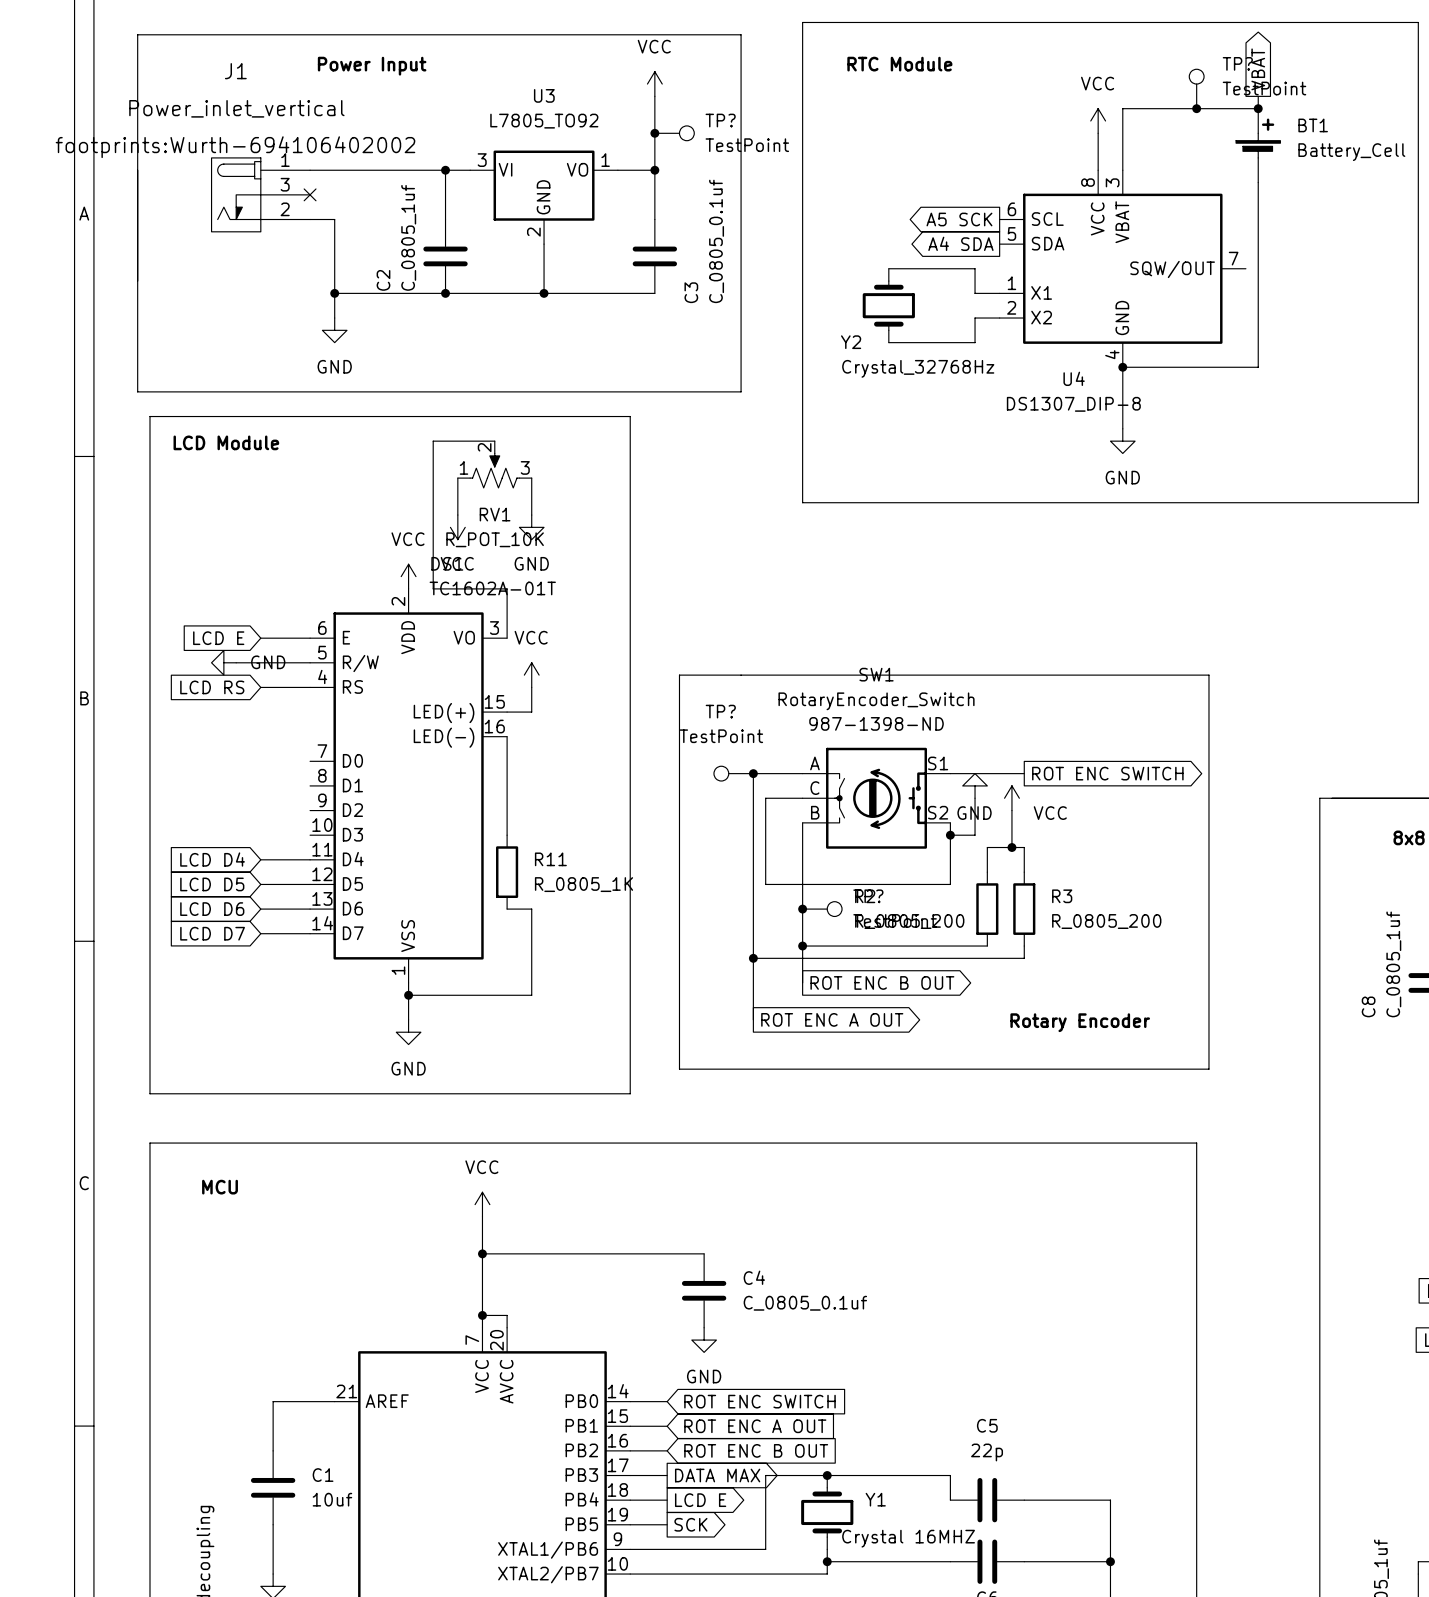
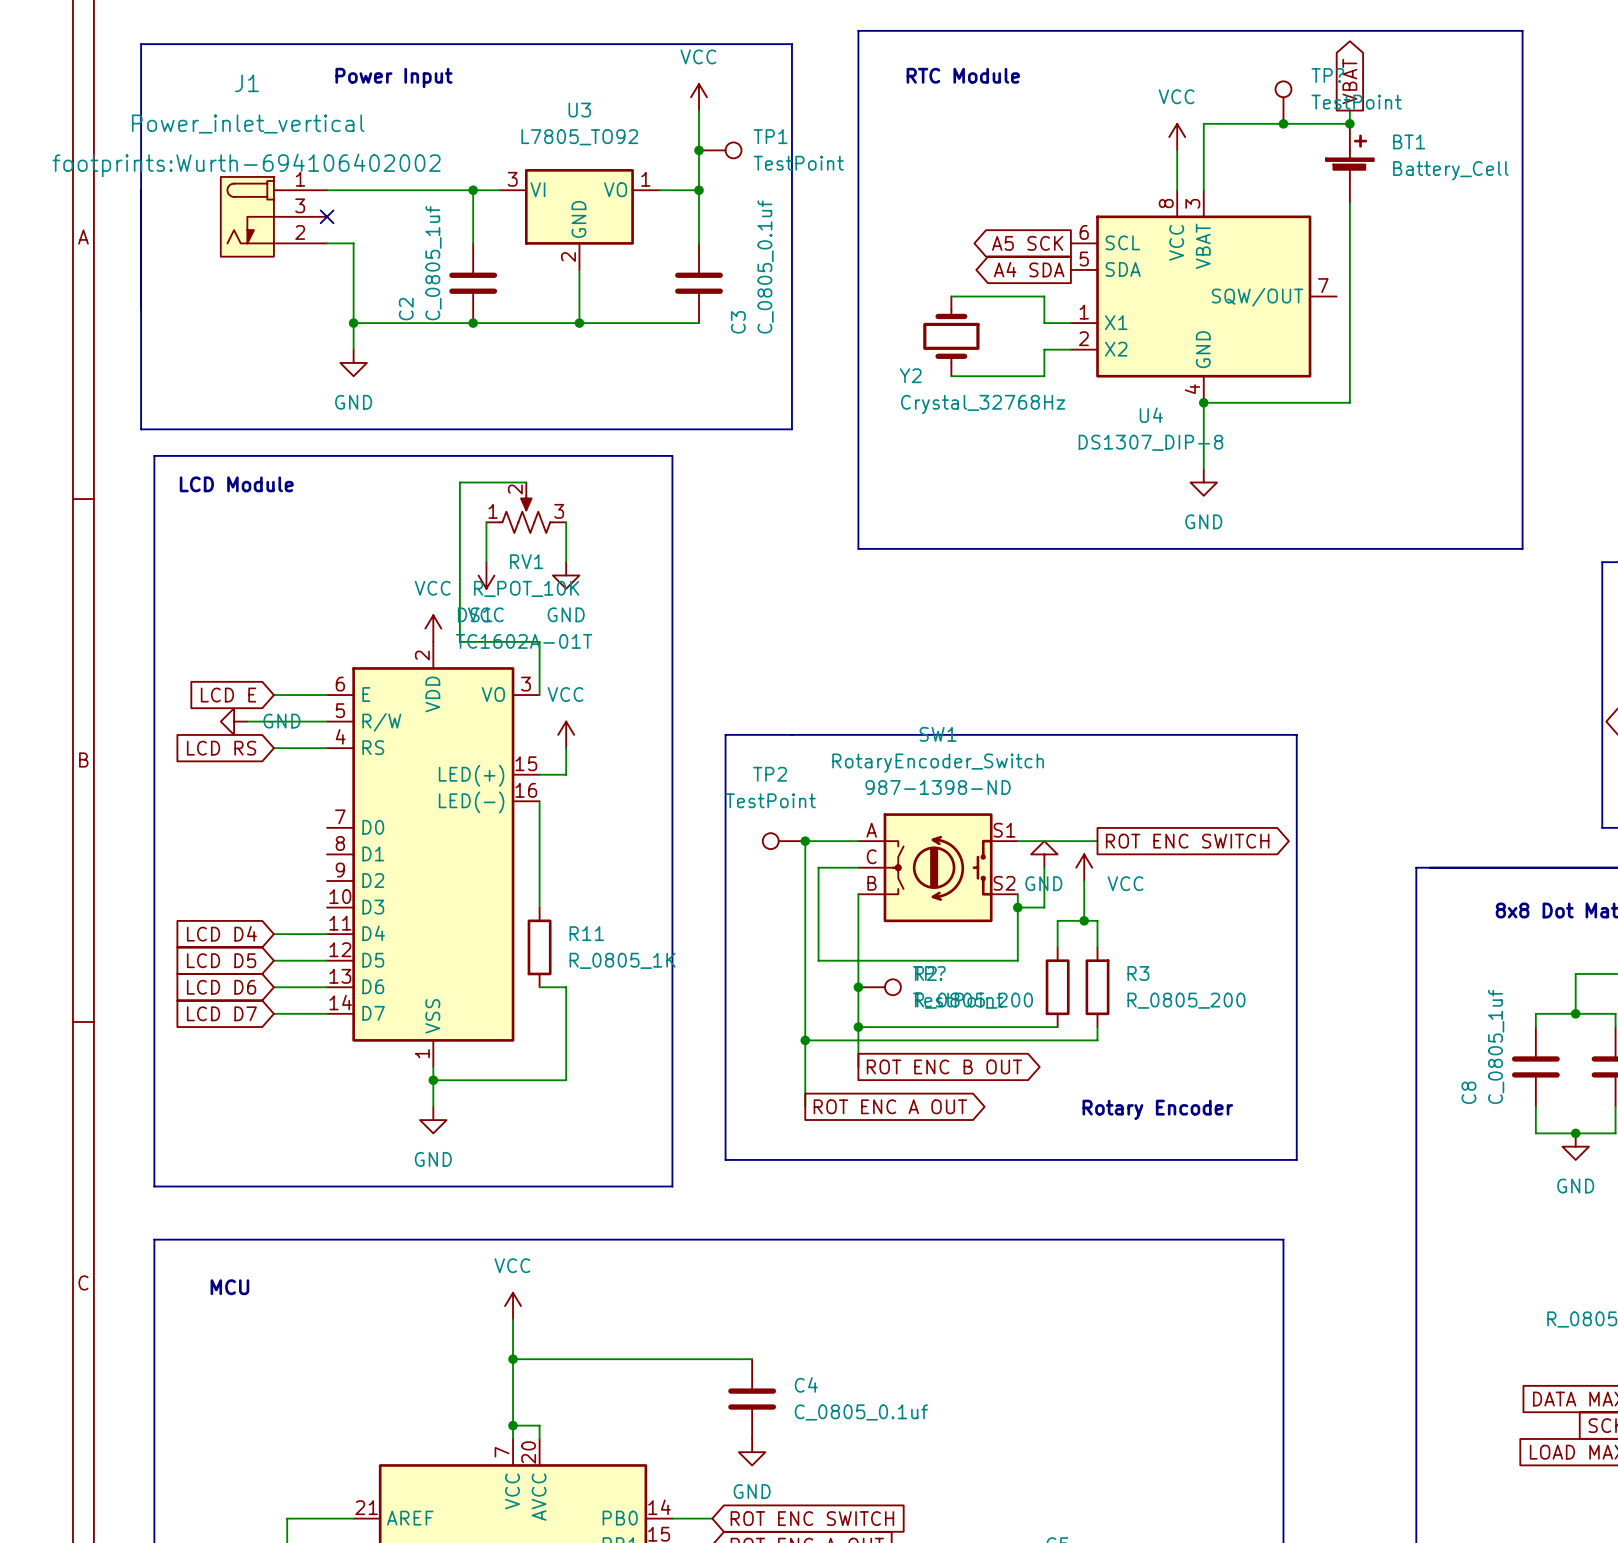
TP? name: TP? (720, 120) -> TP1 (770, 136)
TP? name: TP? (720, 711) -> TP2 (770, 774)

